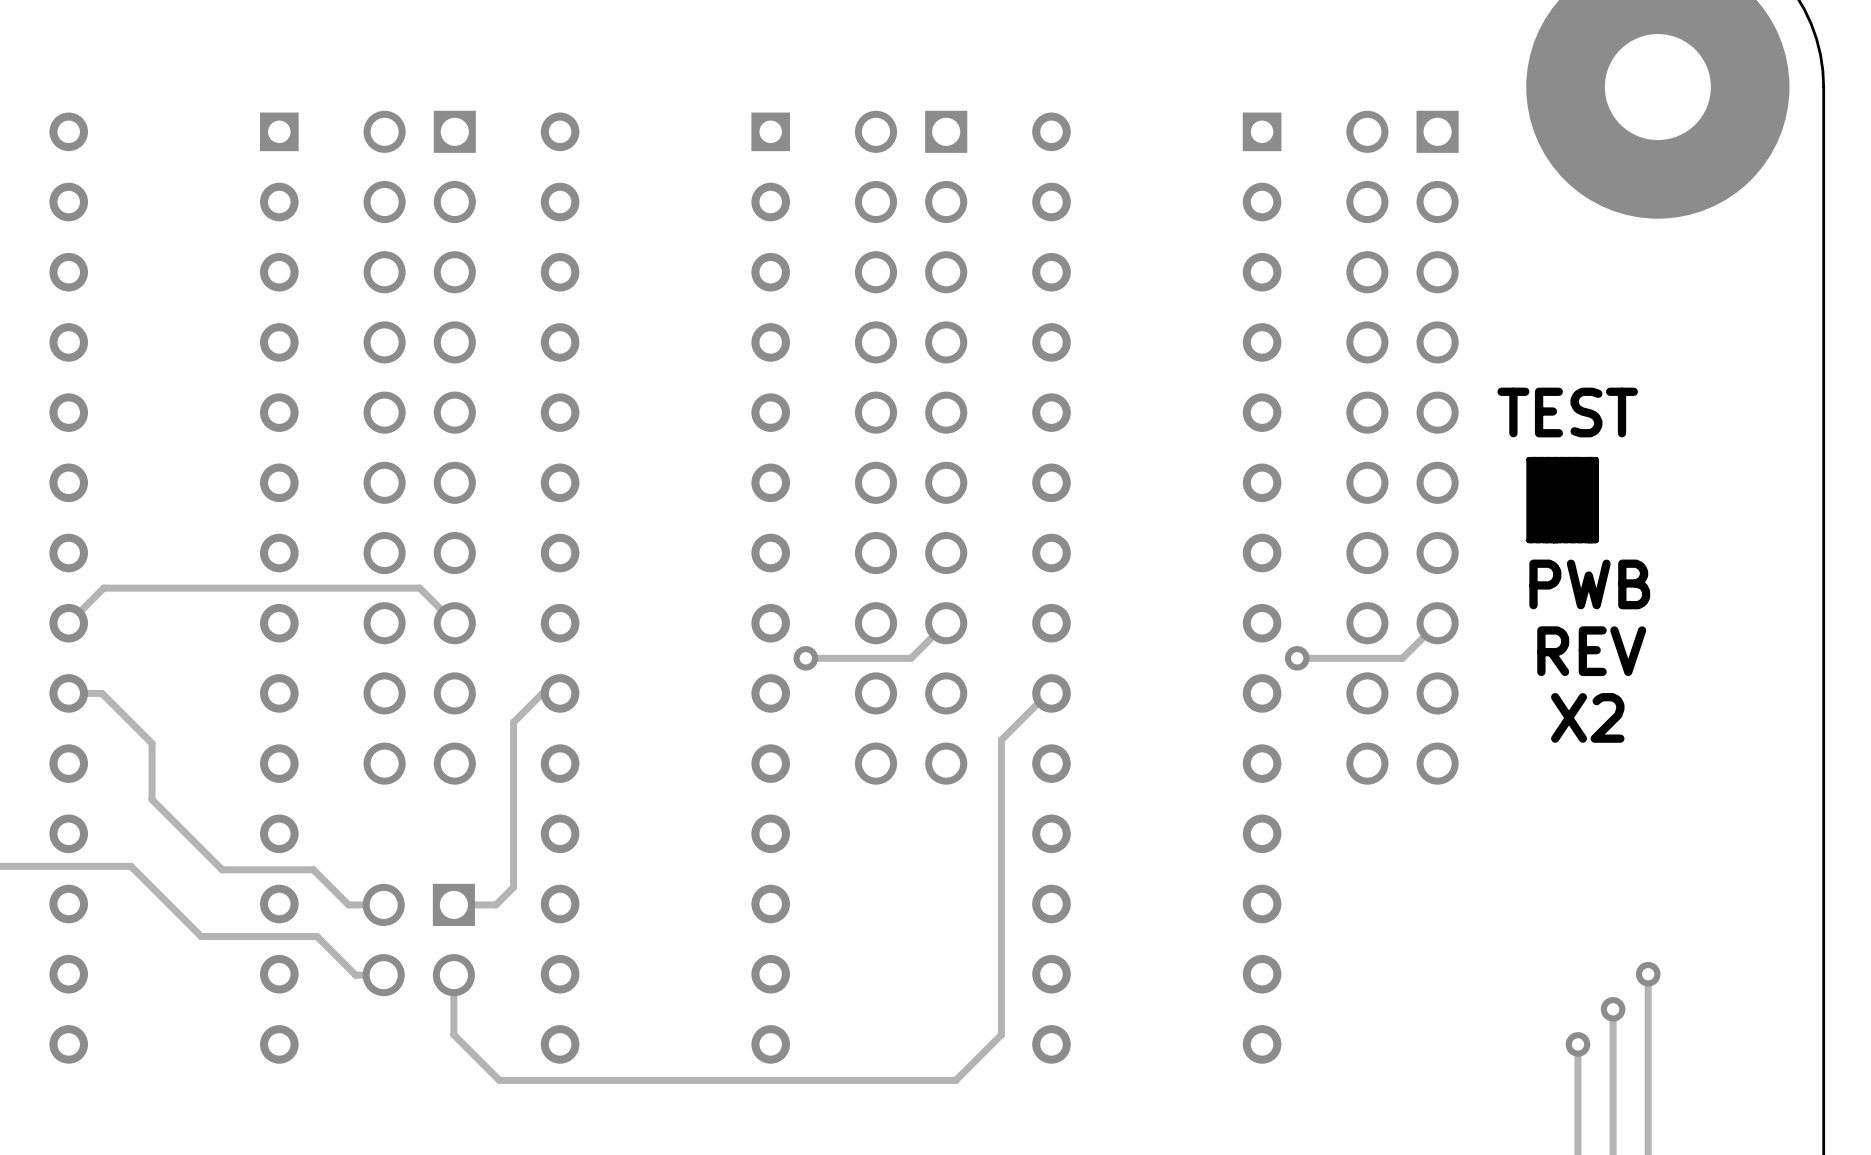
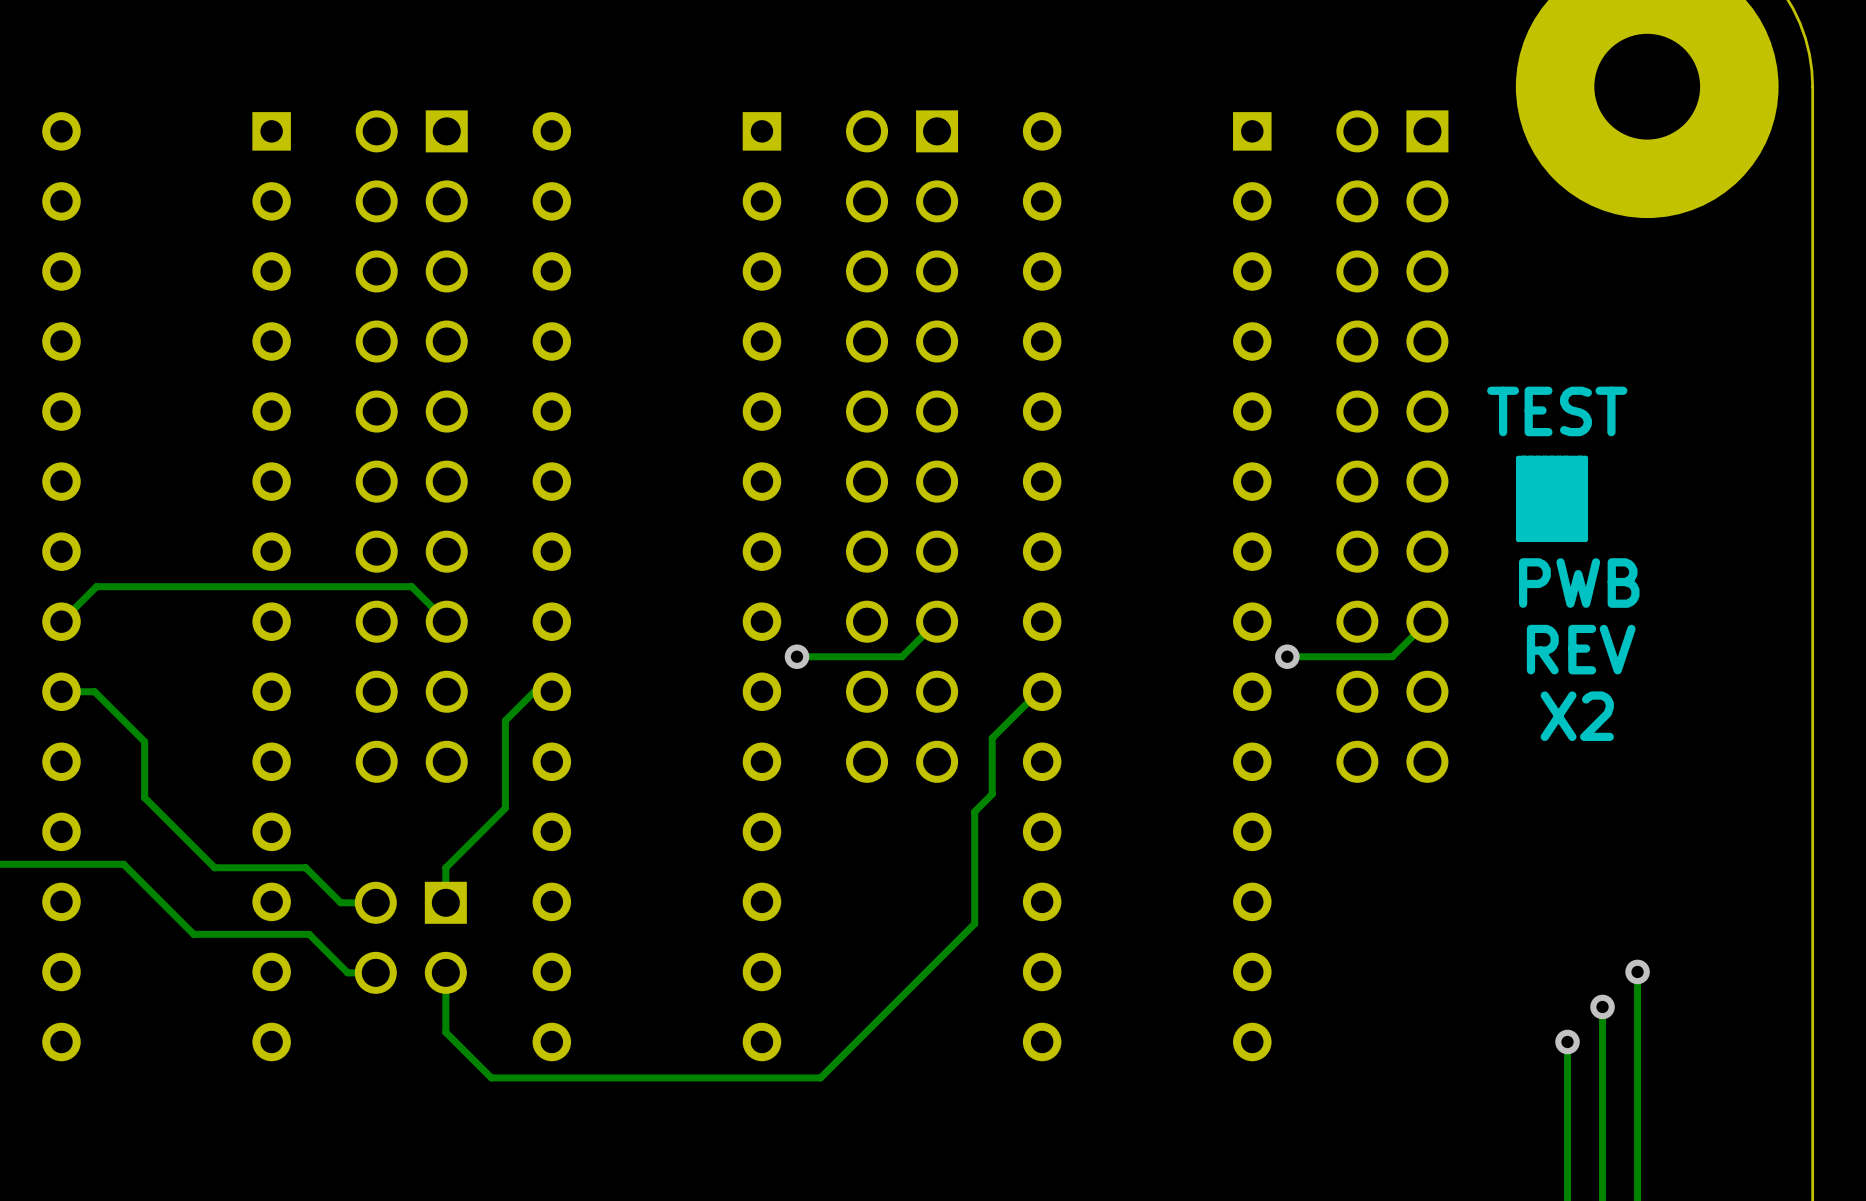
track: (1001, 796) (1001, 1034) (955, 1080) (829, 1080) -> (992, 794) (974, 811) (974, 923) (820, 1077)
track: (513, 810) (513, 887) (496, 904) (453, 904) -> (505, 808) (445, 867) (445, 902)

